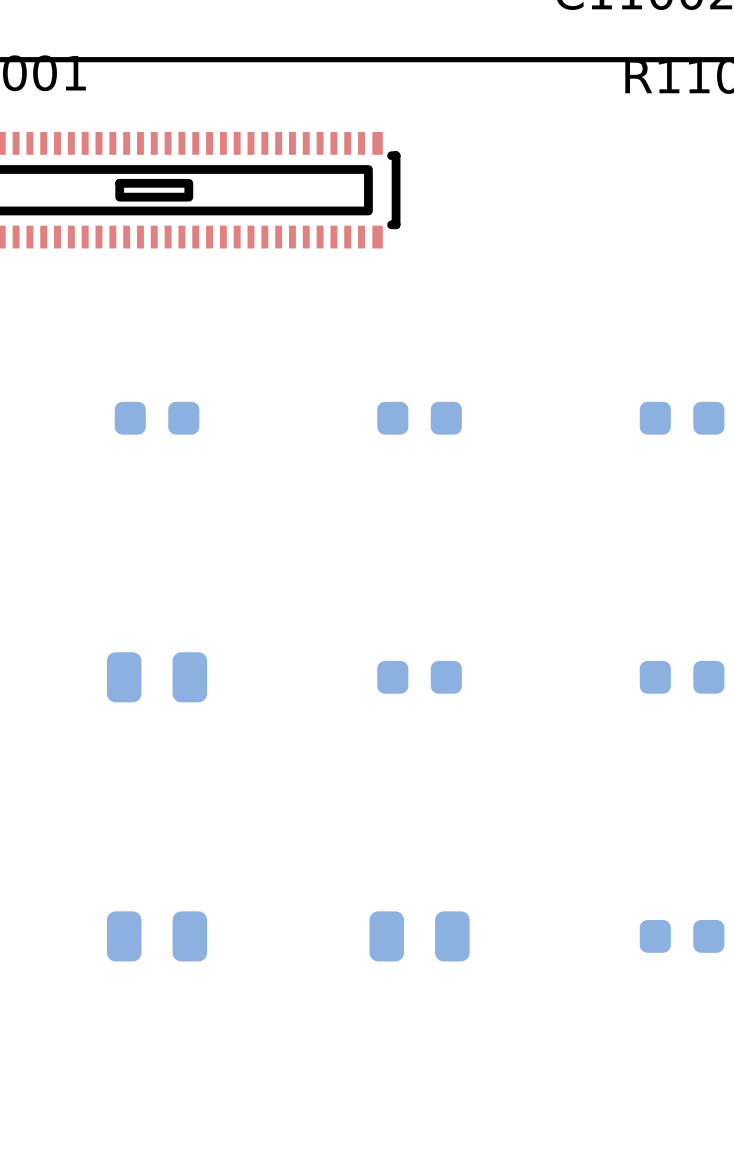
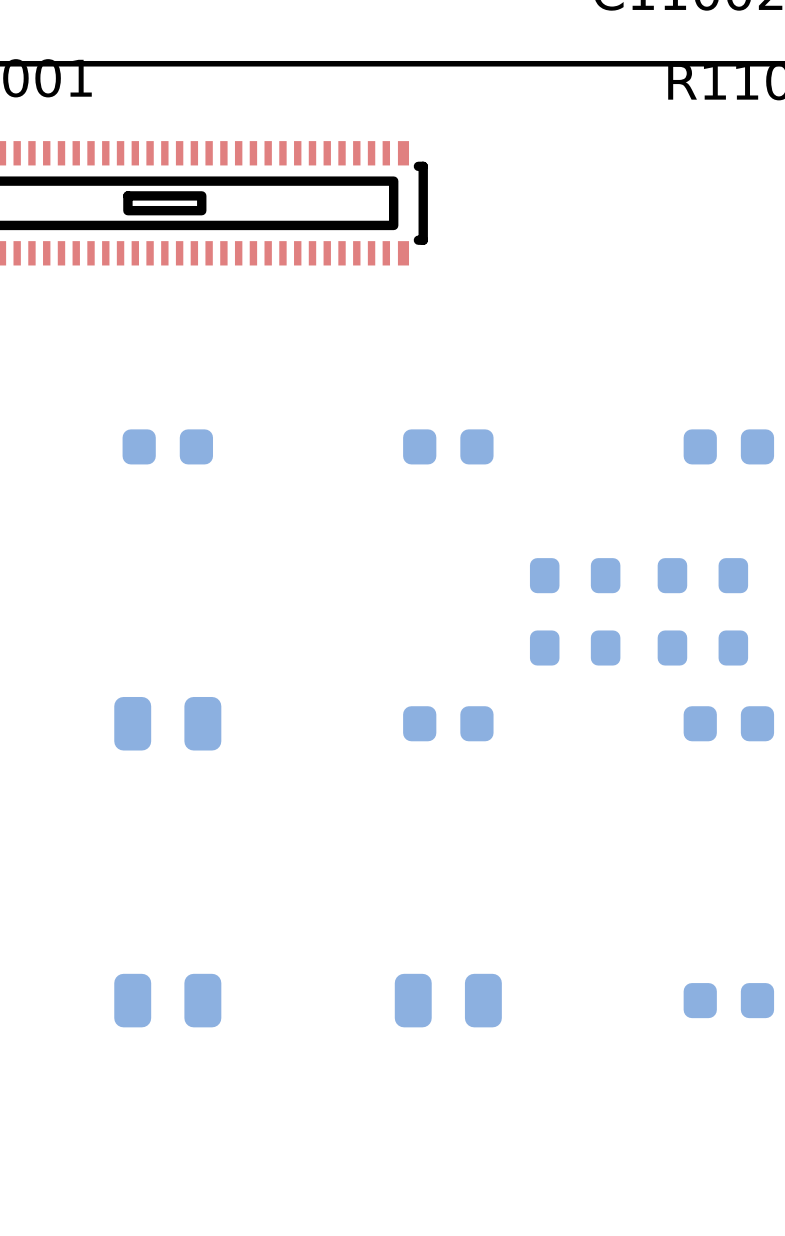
part: none -> (575, 575)
part: none -> (702, 575)
part: none -> (575, 648)
part: none -> (702, 648)

